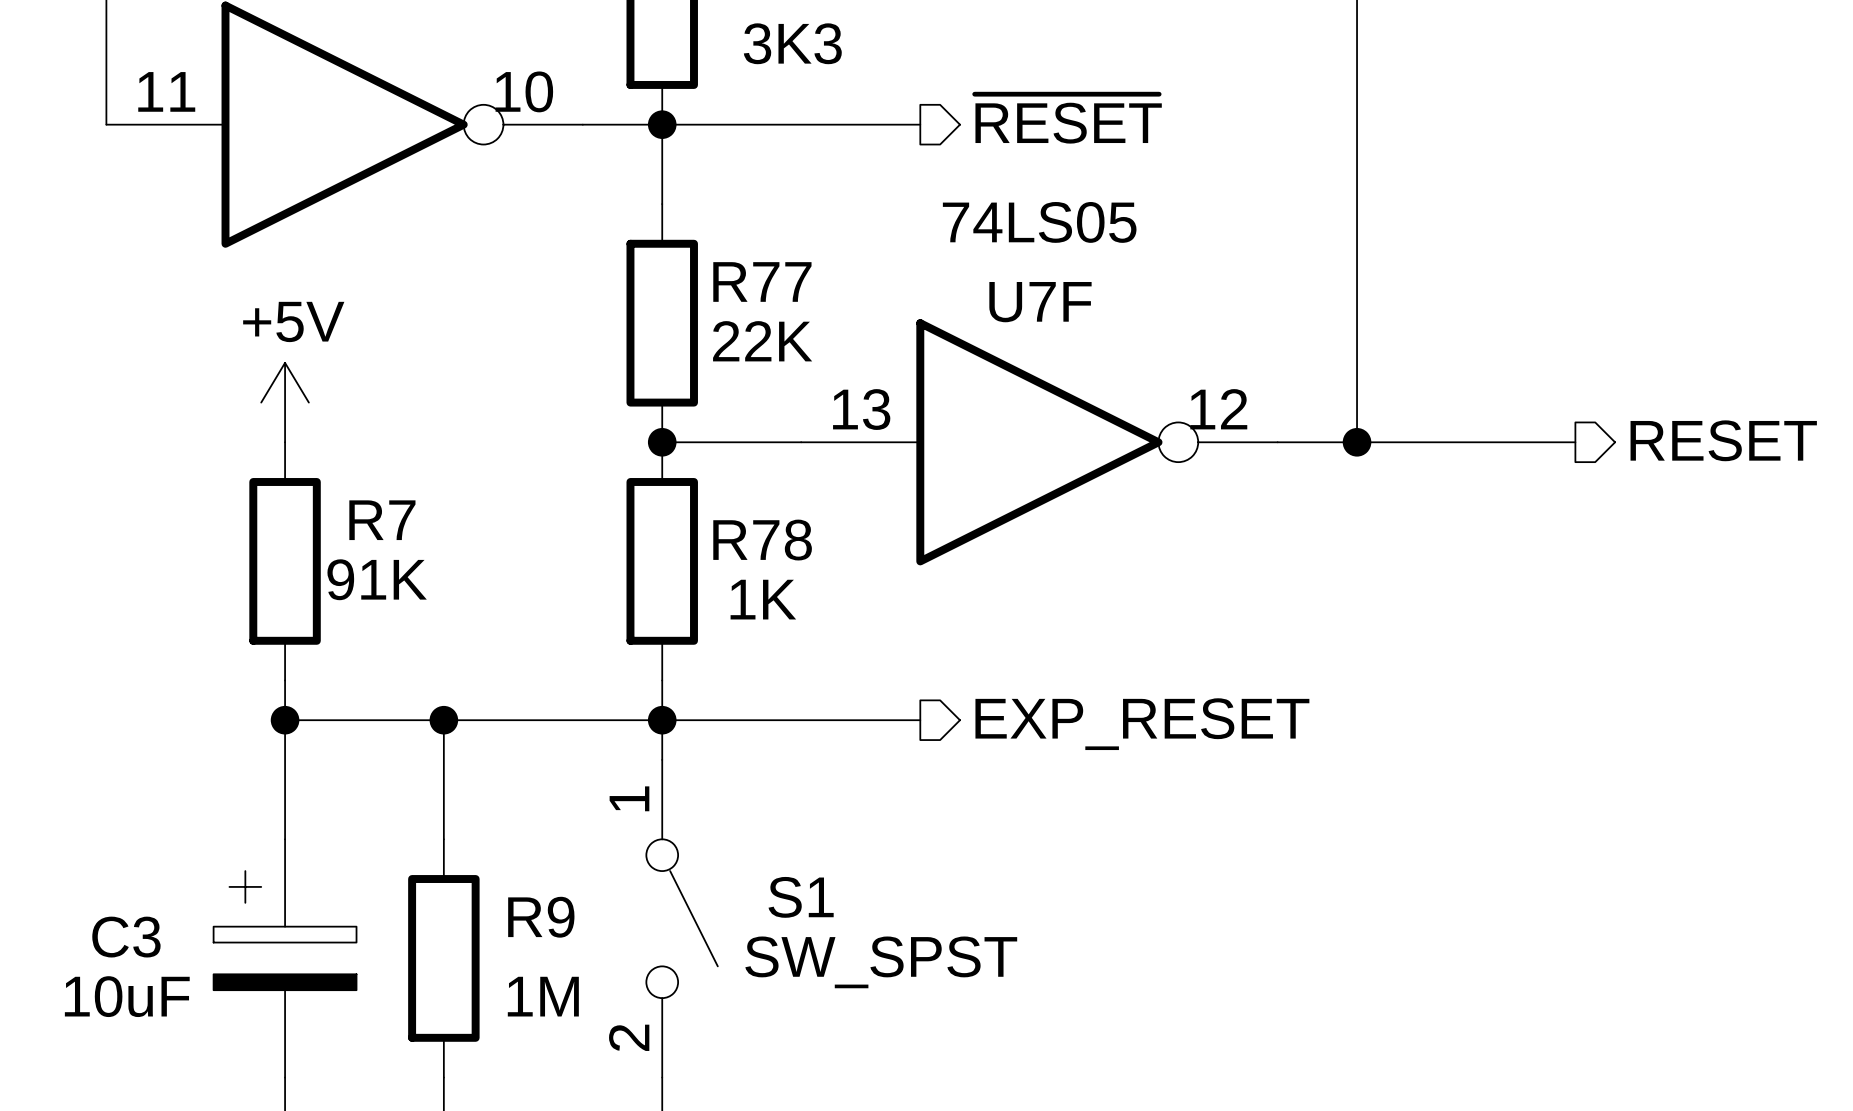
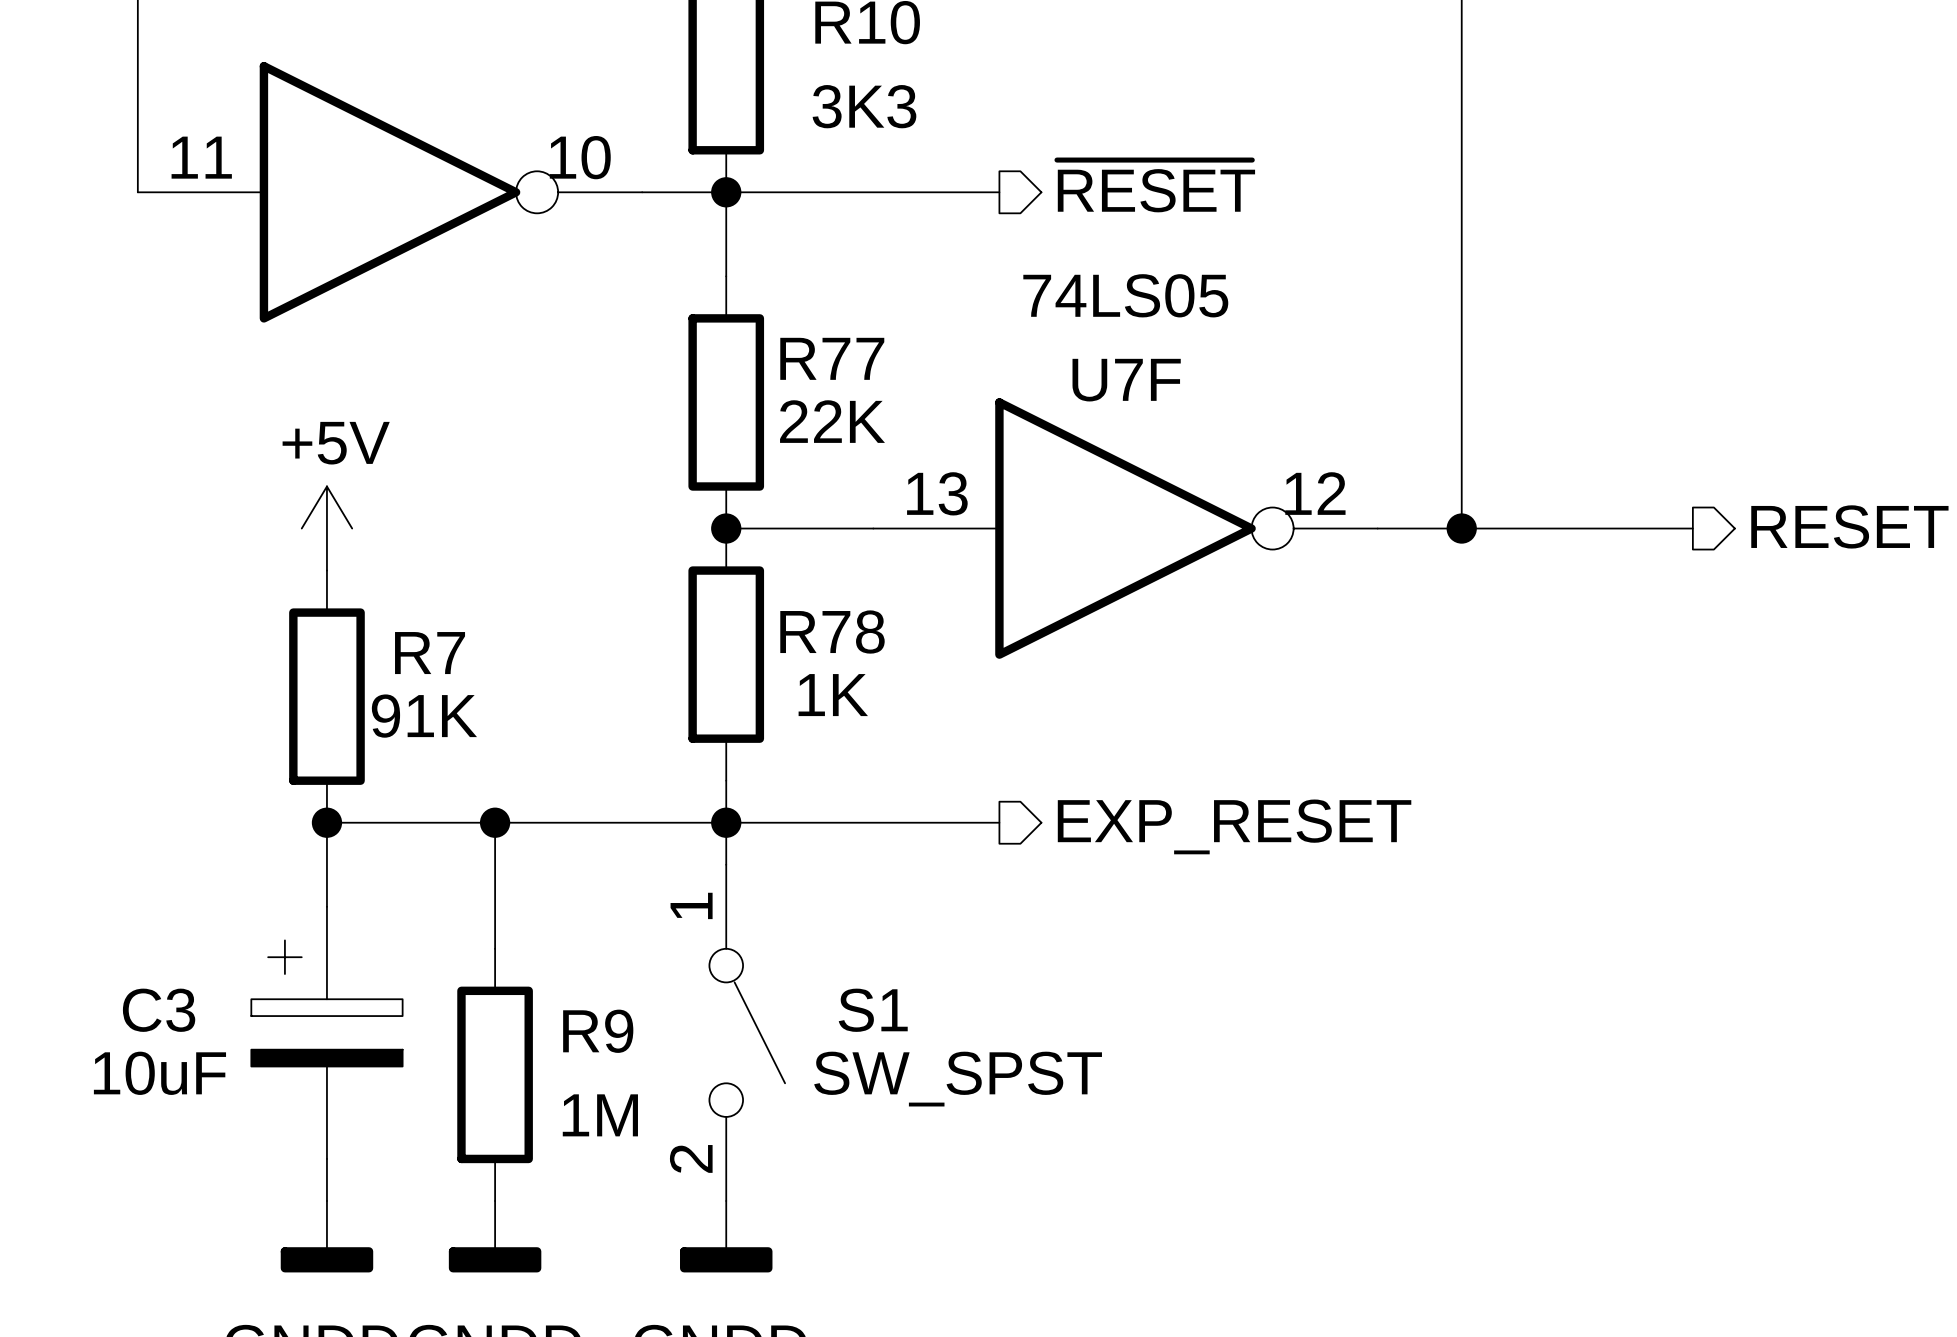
power symbol position: +5V (285, 402) -> +5V (326, 528)
R7 position: (285, 561) -> (326, 696)
C3 position: (285, 958) -> (326, 1032)

